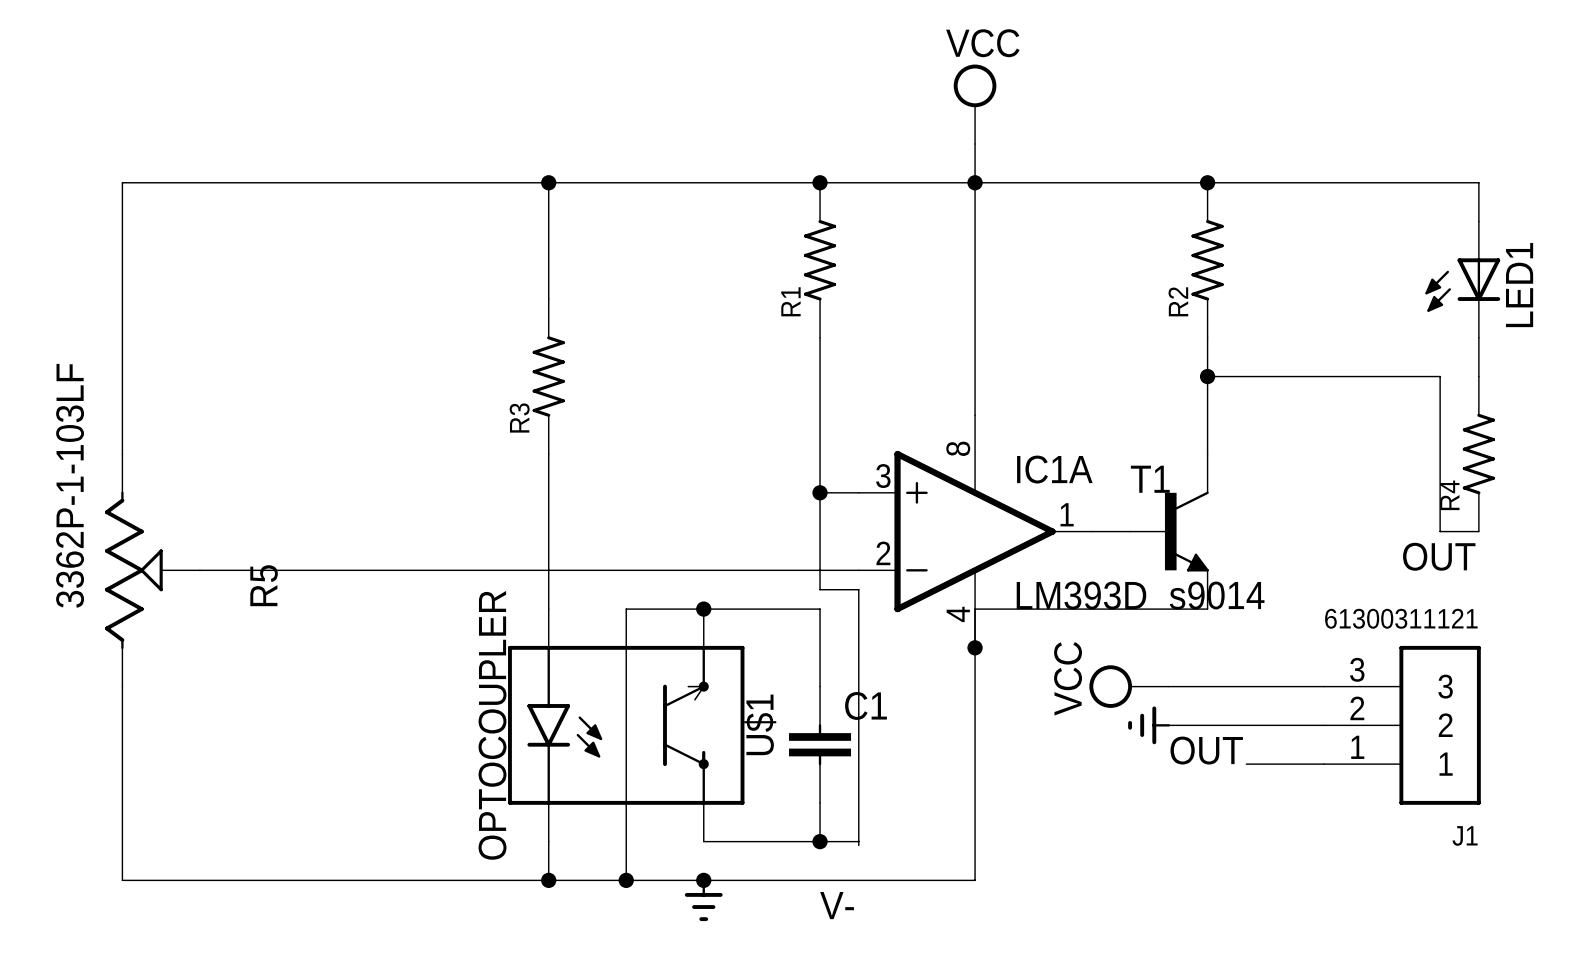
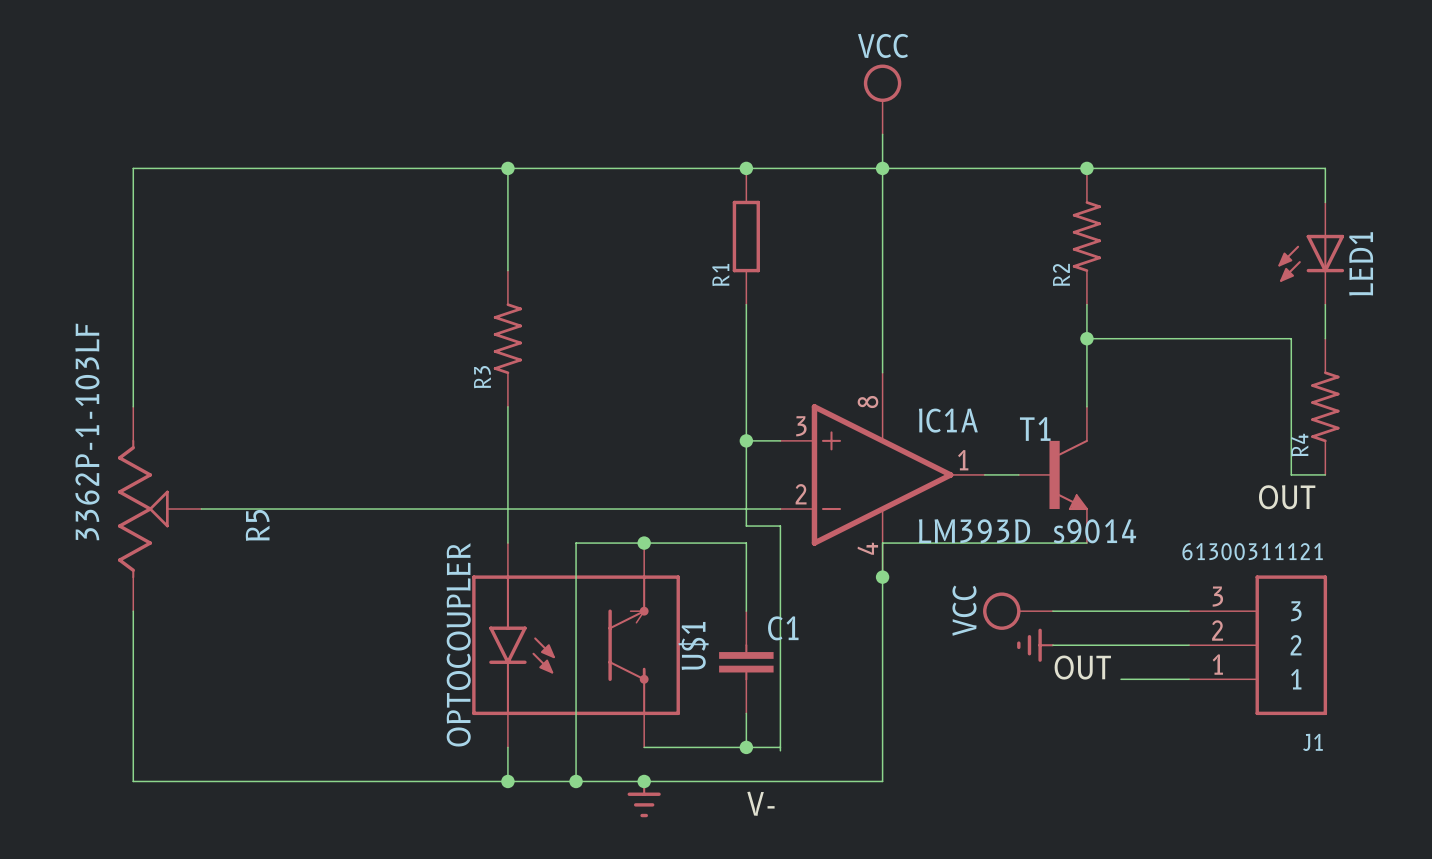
R1 symbol: [803, 182, 837, 338] -> [732, 168, 760, 305]

